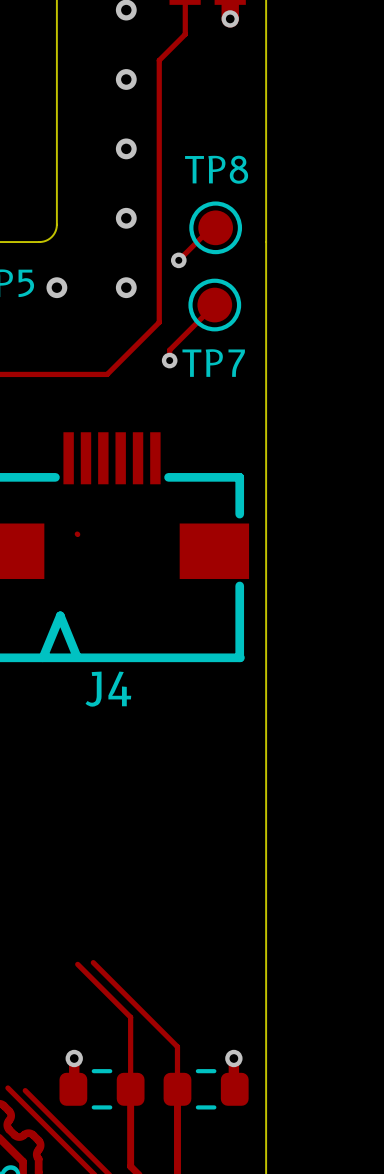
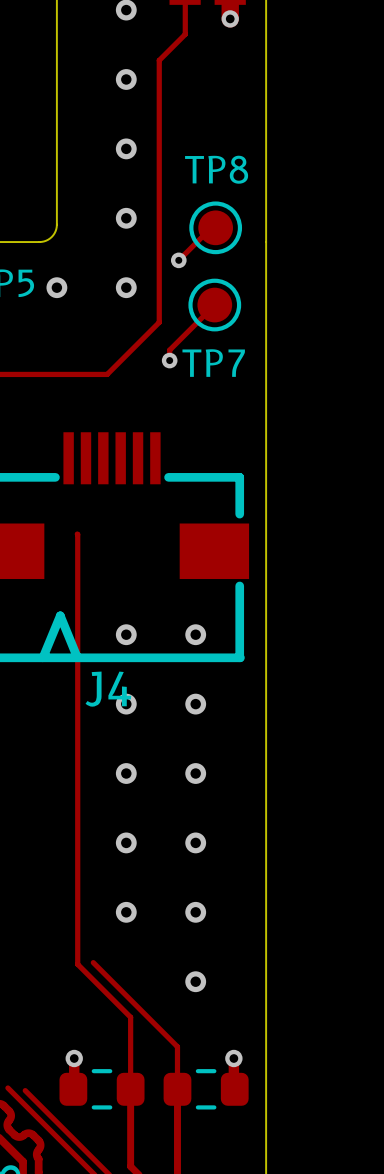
track: none -> (77, 534) (77, 964)
via: none -> (126, 634)
via: none -> (195, 634)
via: none -> (126, 704)
via: none -> (195, 704)
via: none -> (126, 773)
via: none -> (195, 773)
via: none -> (126, 842)
via: none -> (195, 842)
via: none -> (126, 912)
via: none -> (195, 912)
via: none -> (195, 981)

